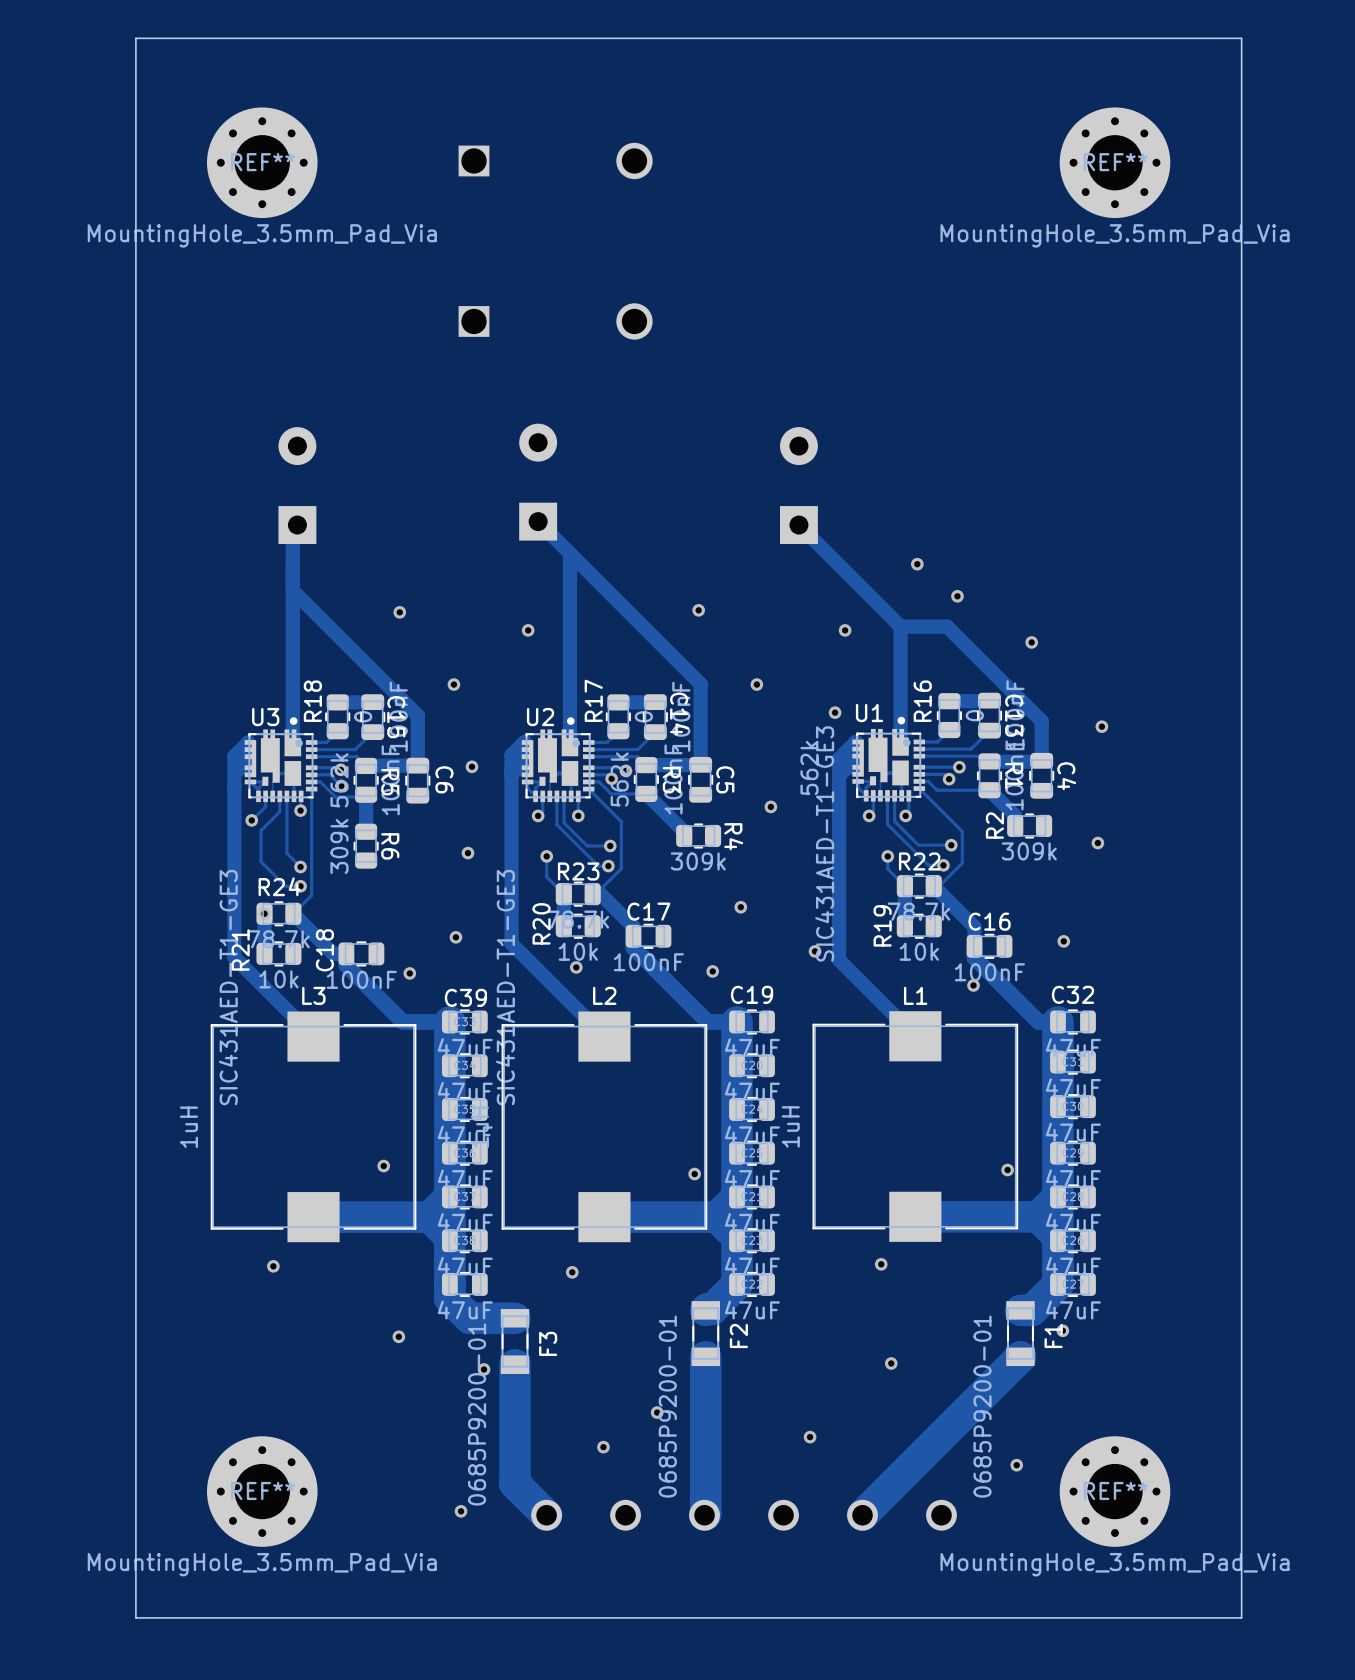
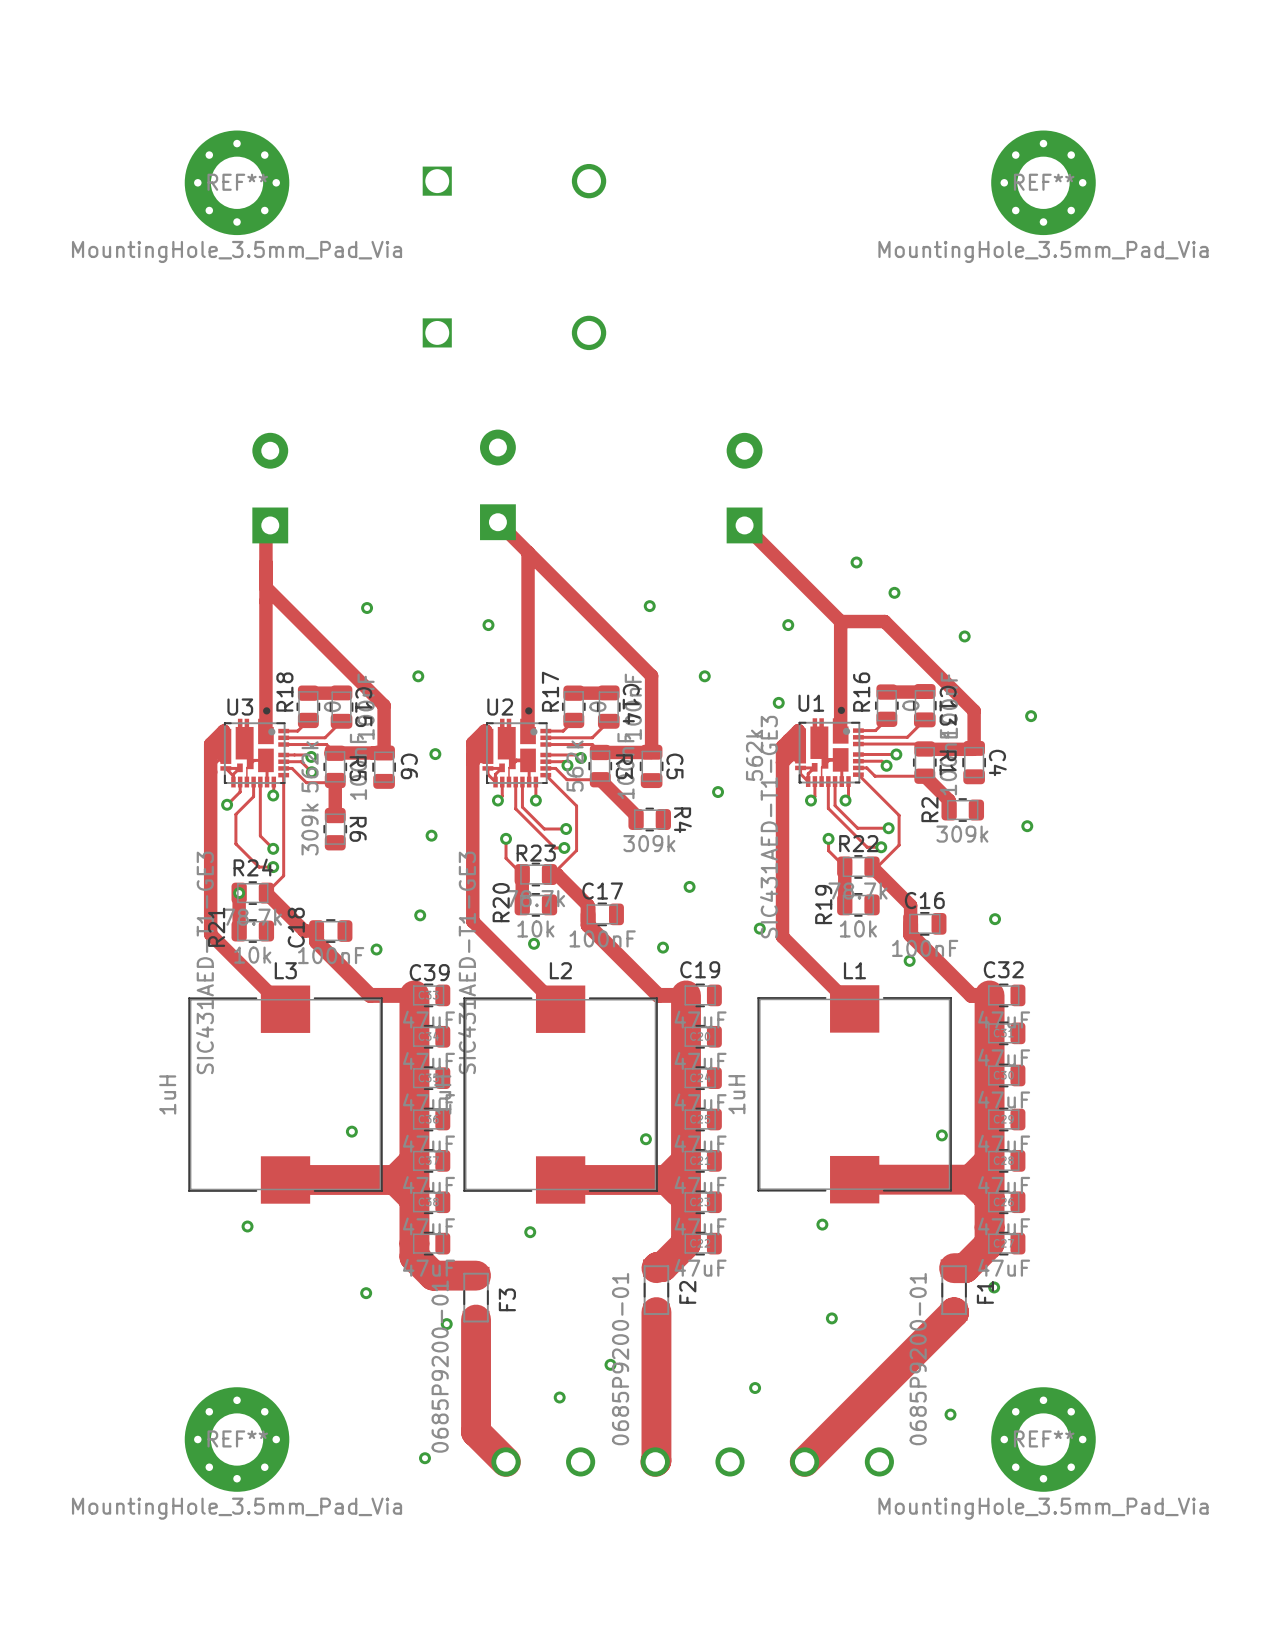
board edge: (135, 38) (1241, 38) (1241, 1617) (135, 1617) (135, 38) -> none

